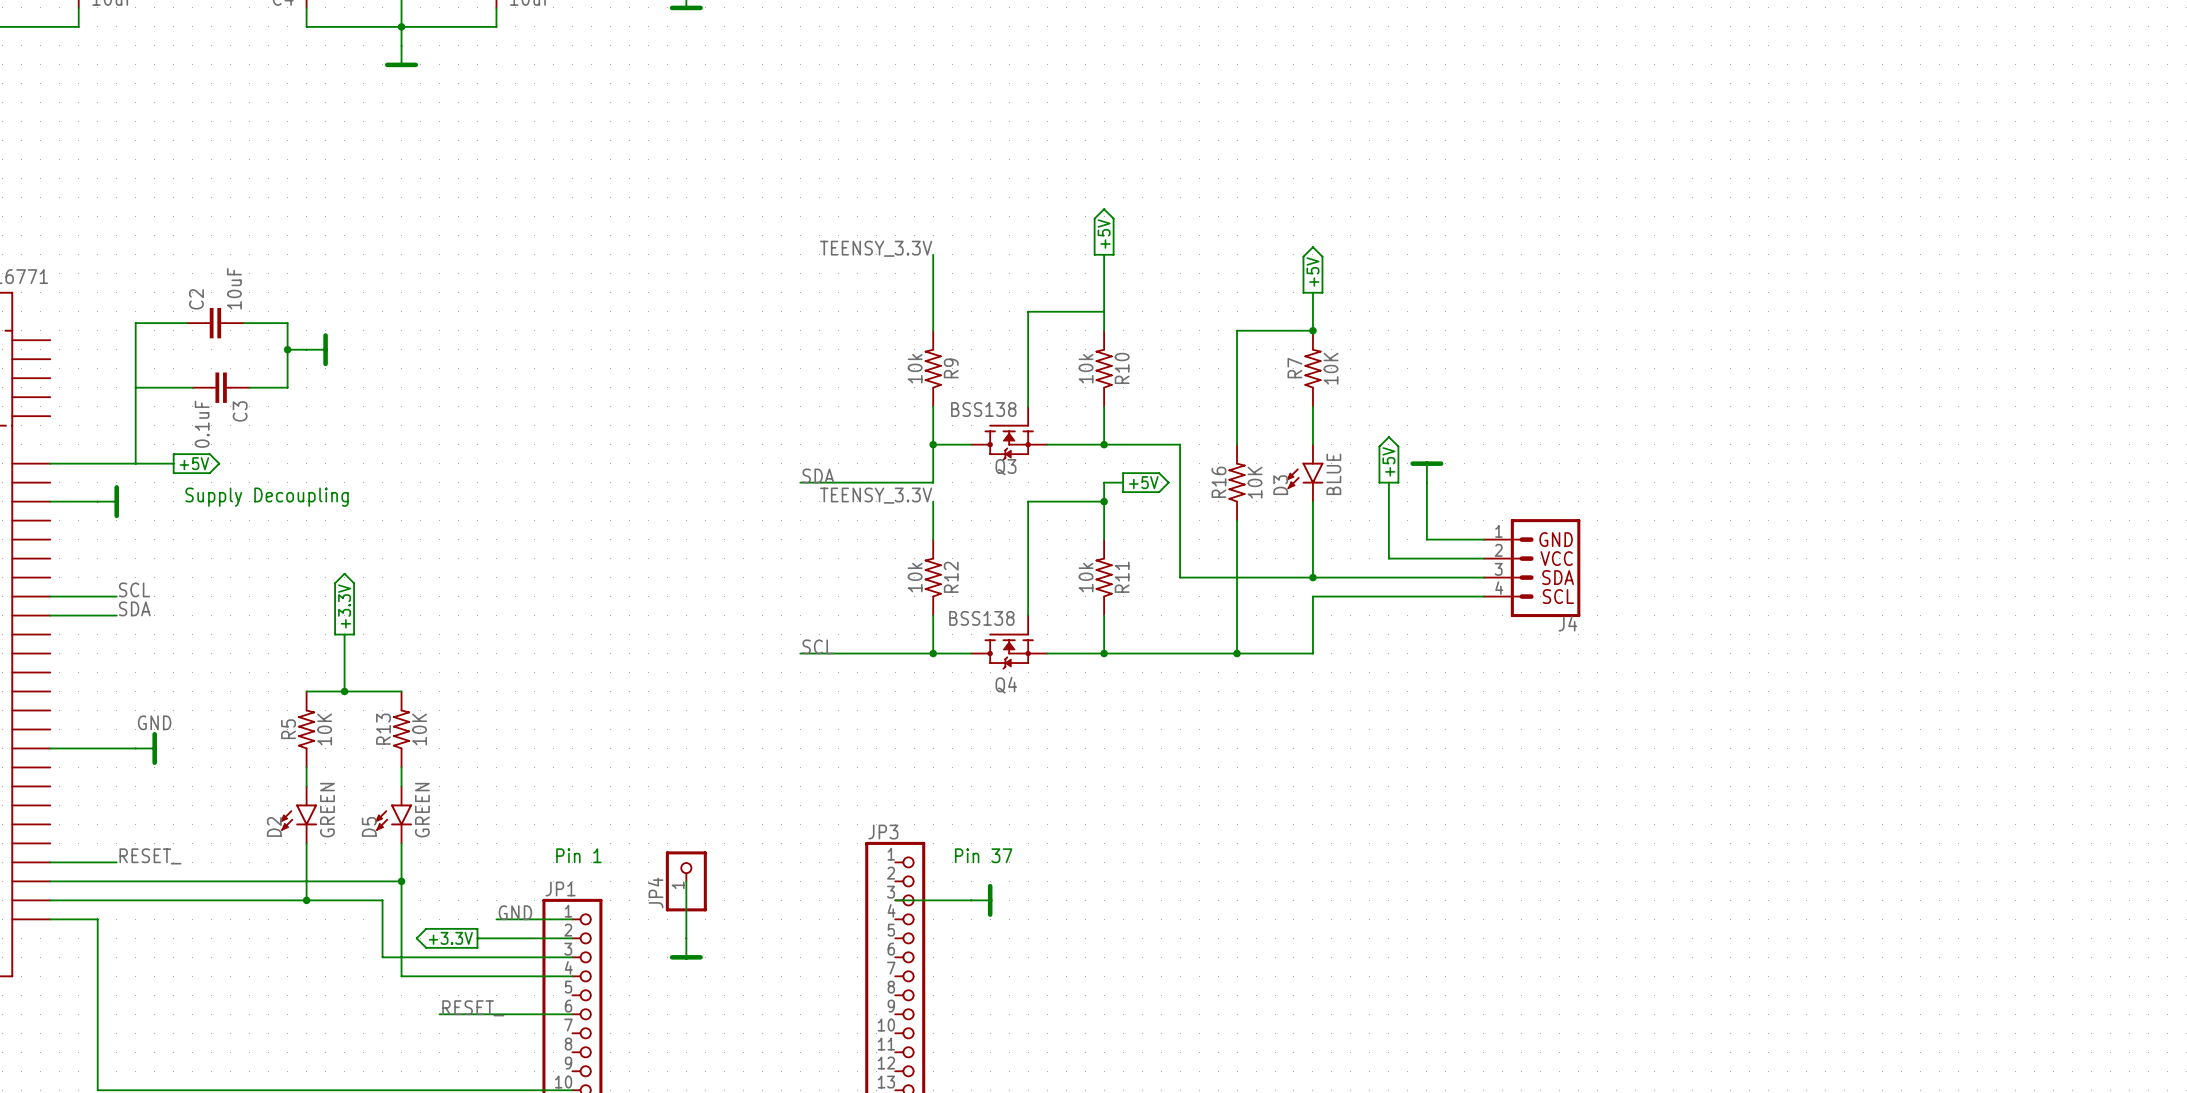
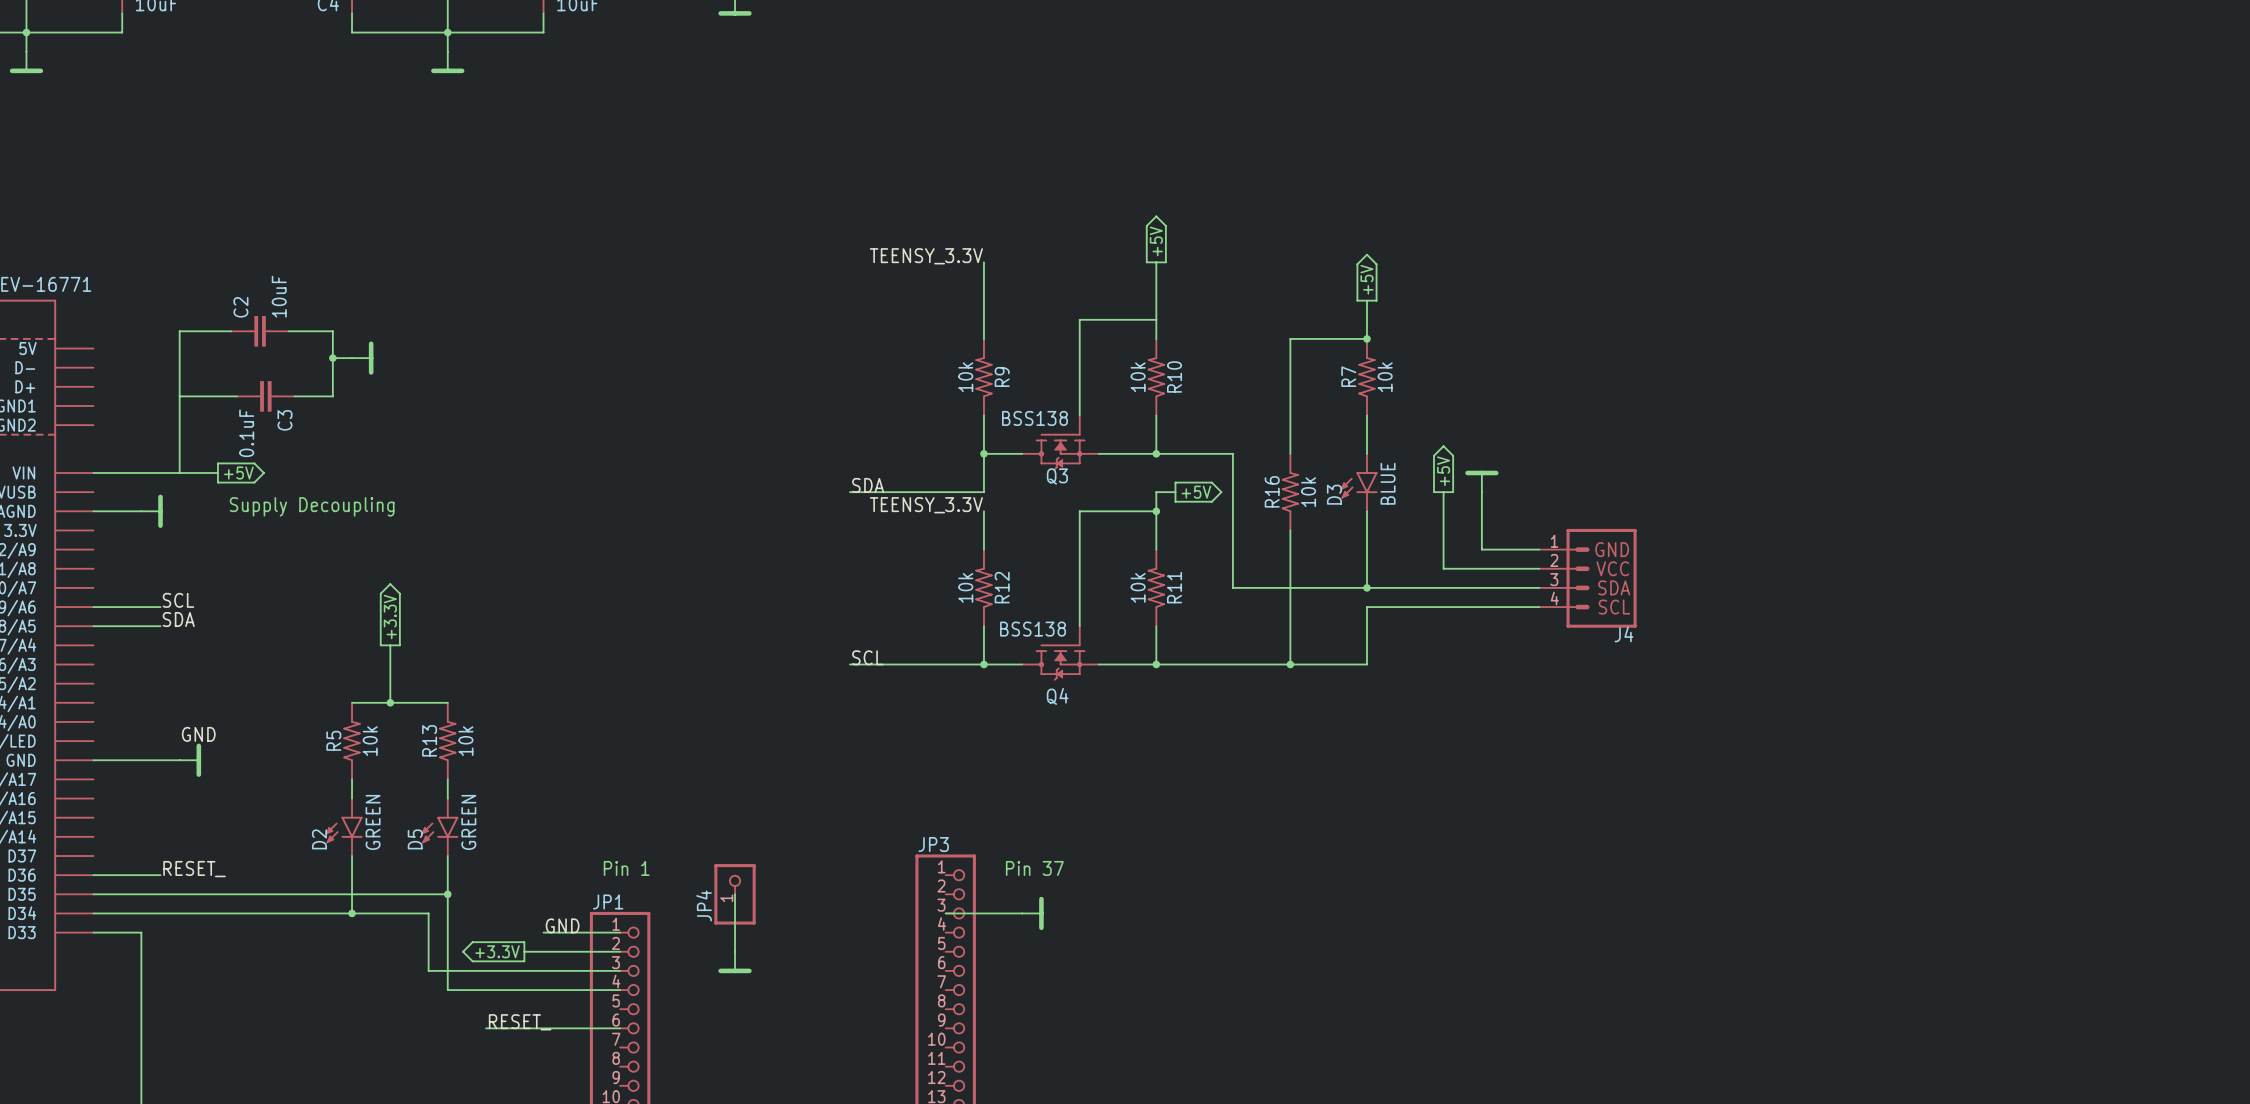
R7 value: 10K (1331, 368) -> 10k (1385, 377)
R16 value: 10K (1255, 482) -> 10k (1308, 492)
R5 value: 10K (324, 729) -> 10k (370, 741)
R13 value: 10K (419, 729) -> 10k (465, 741)

